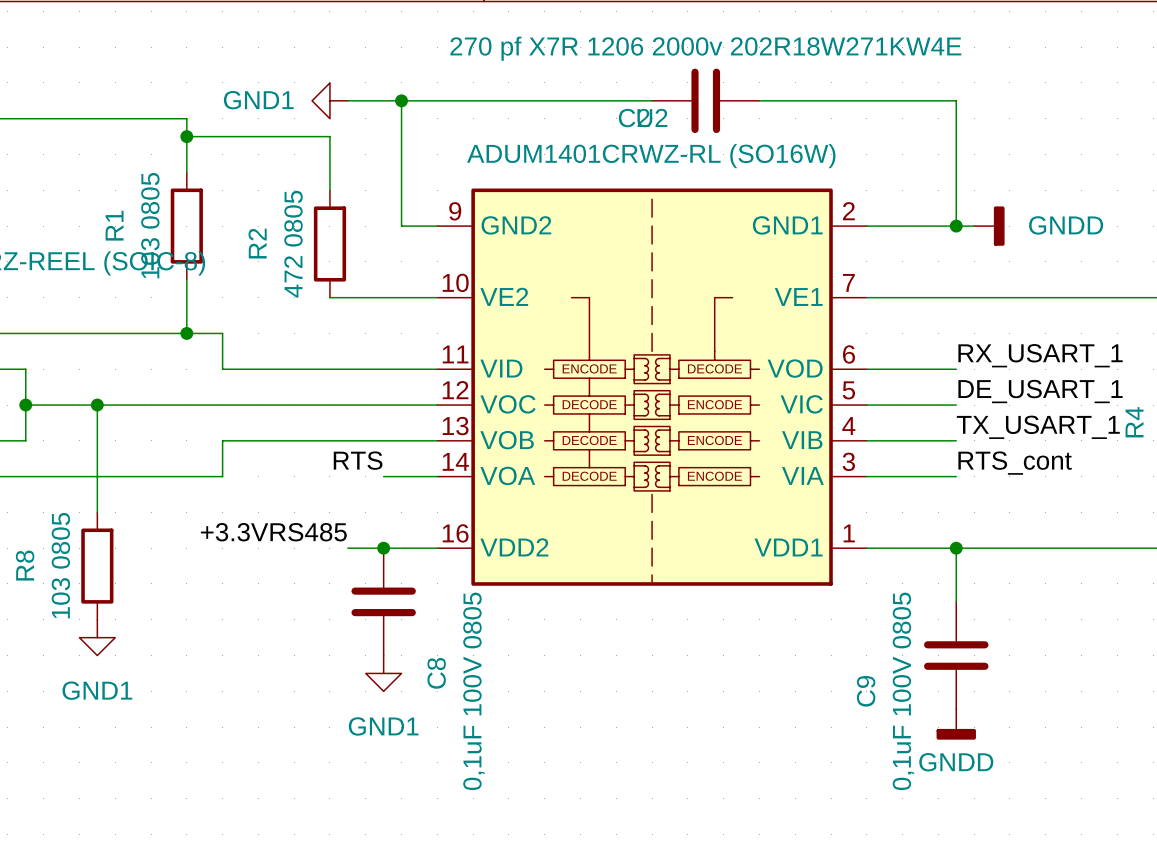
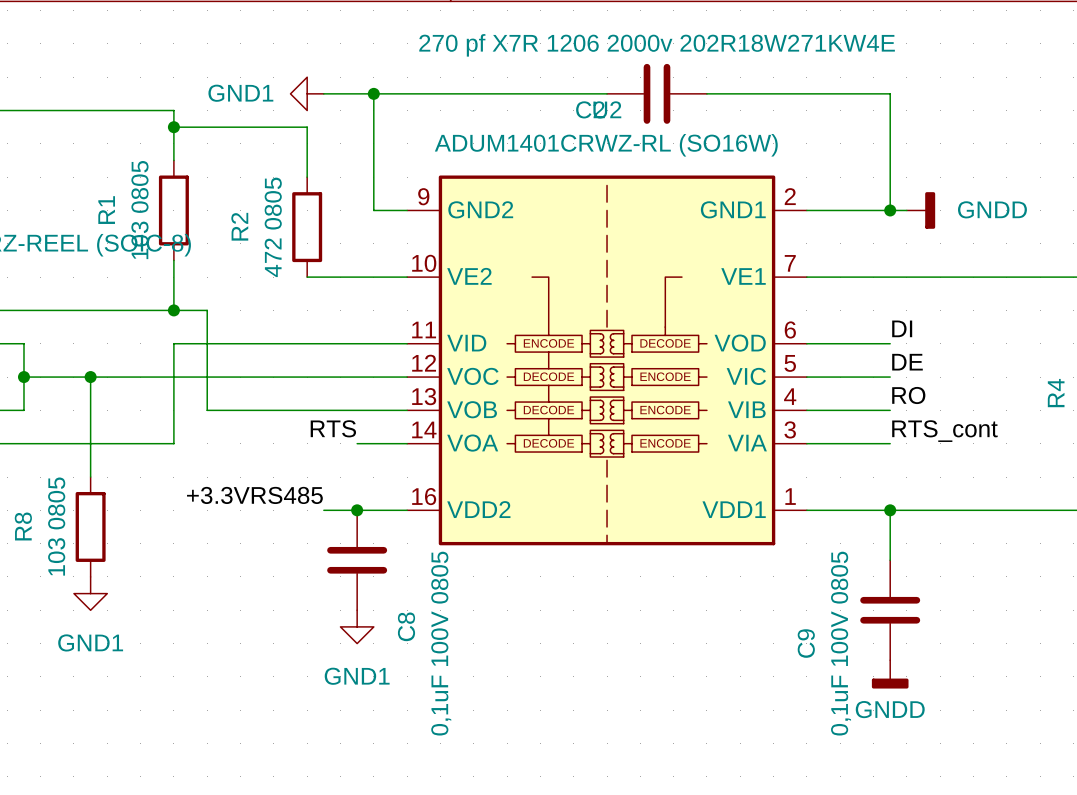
label: RX_USART_1 (1040, 355) -> DI (902, 328)
label: DE_USART_1 (1040, 391) -> DE (907, 362)
label: TX_USART_1 (1038, 427) -> RO (908, 395)
wire: (222, 440) (222, 476) (186, 476) -> (207, 410) (207, 343) (173, 343) (173, 443)

